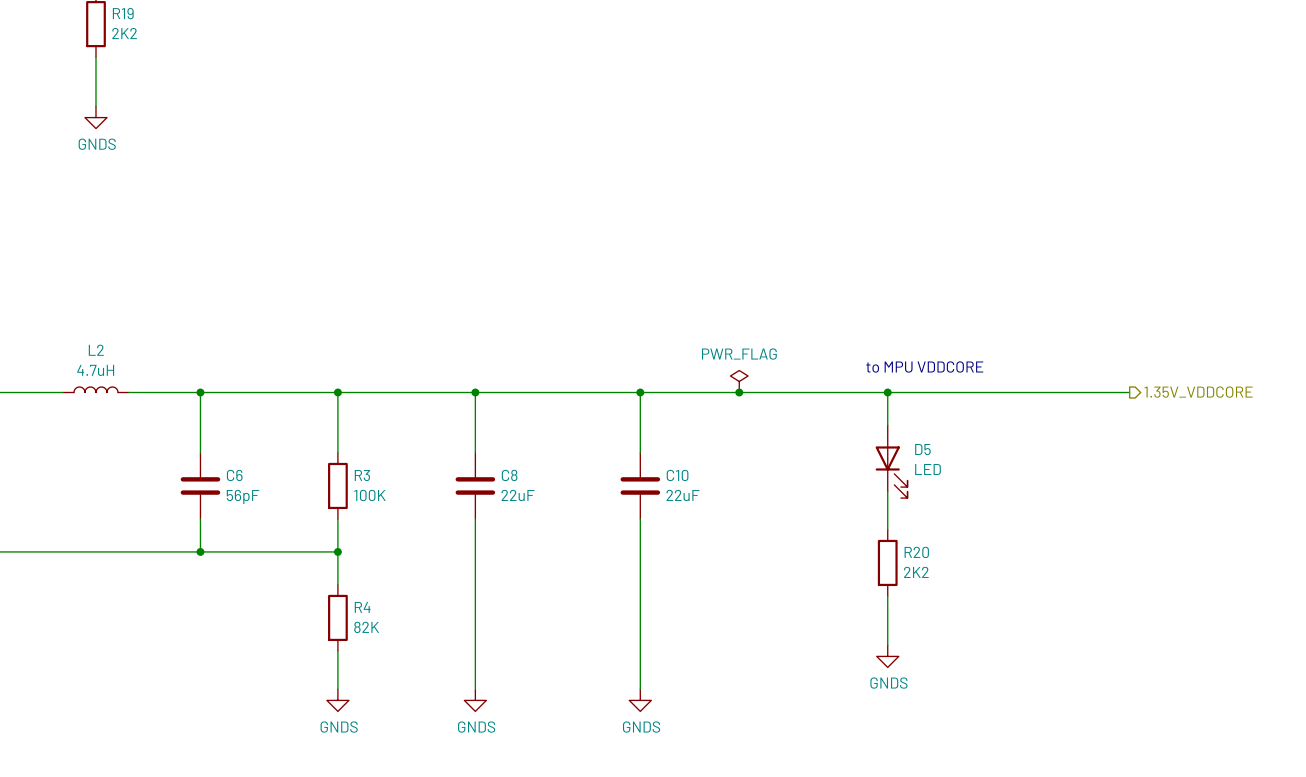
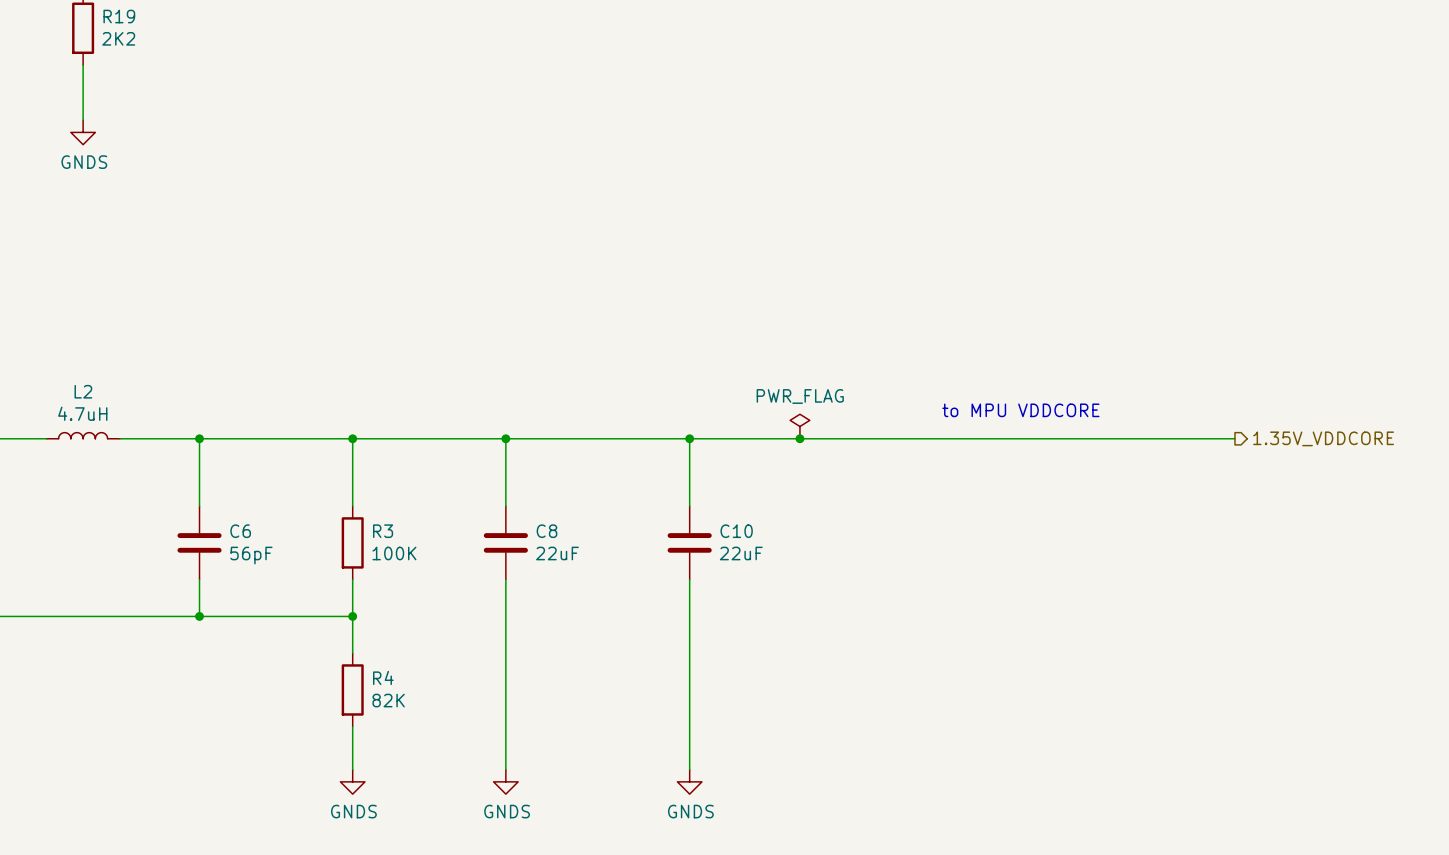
wire: (887, 392) (887, 425) -> none
junction: (887, 392) -> none
D5: LED (891, 461) -> none
wire: (887, 491) (887, 529) -> none
R20: 2K2 (887, 562) -> none
wire: (887, 595) (887, 645) -> none
power symbol: GNDS (887, 656) -> none

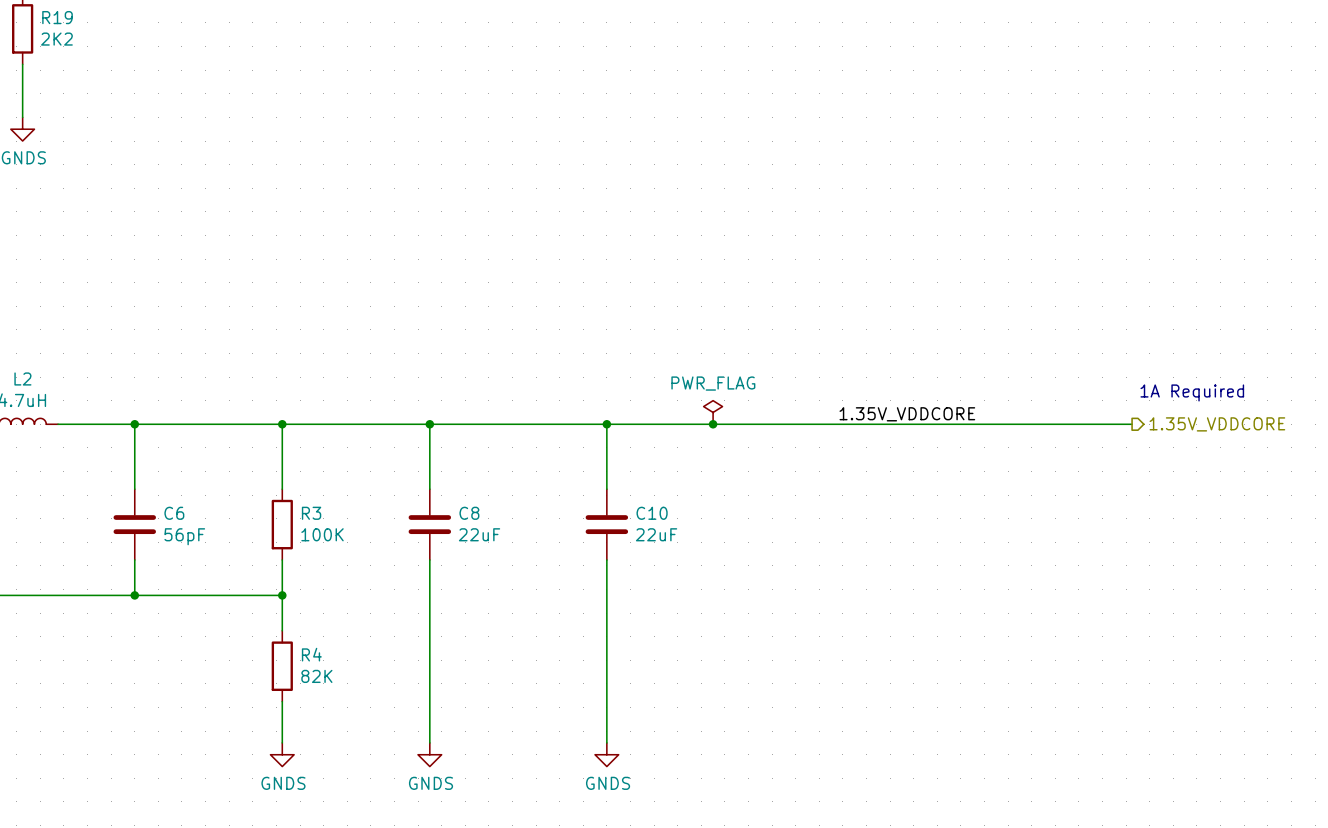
text: none -> 1A Required (1192, 392)
text: to MPU VDDCORE (1020, 410) -> none
label: none -> 1.35V_VDDCORE (907, 414)

